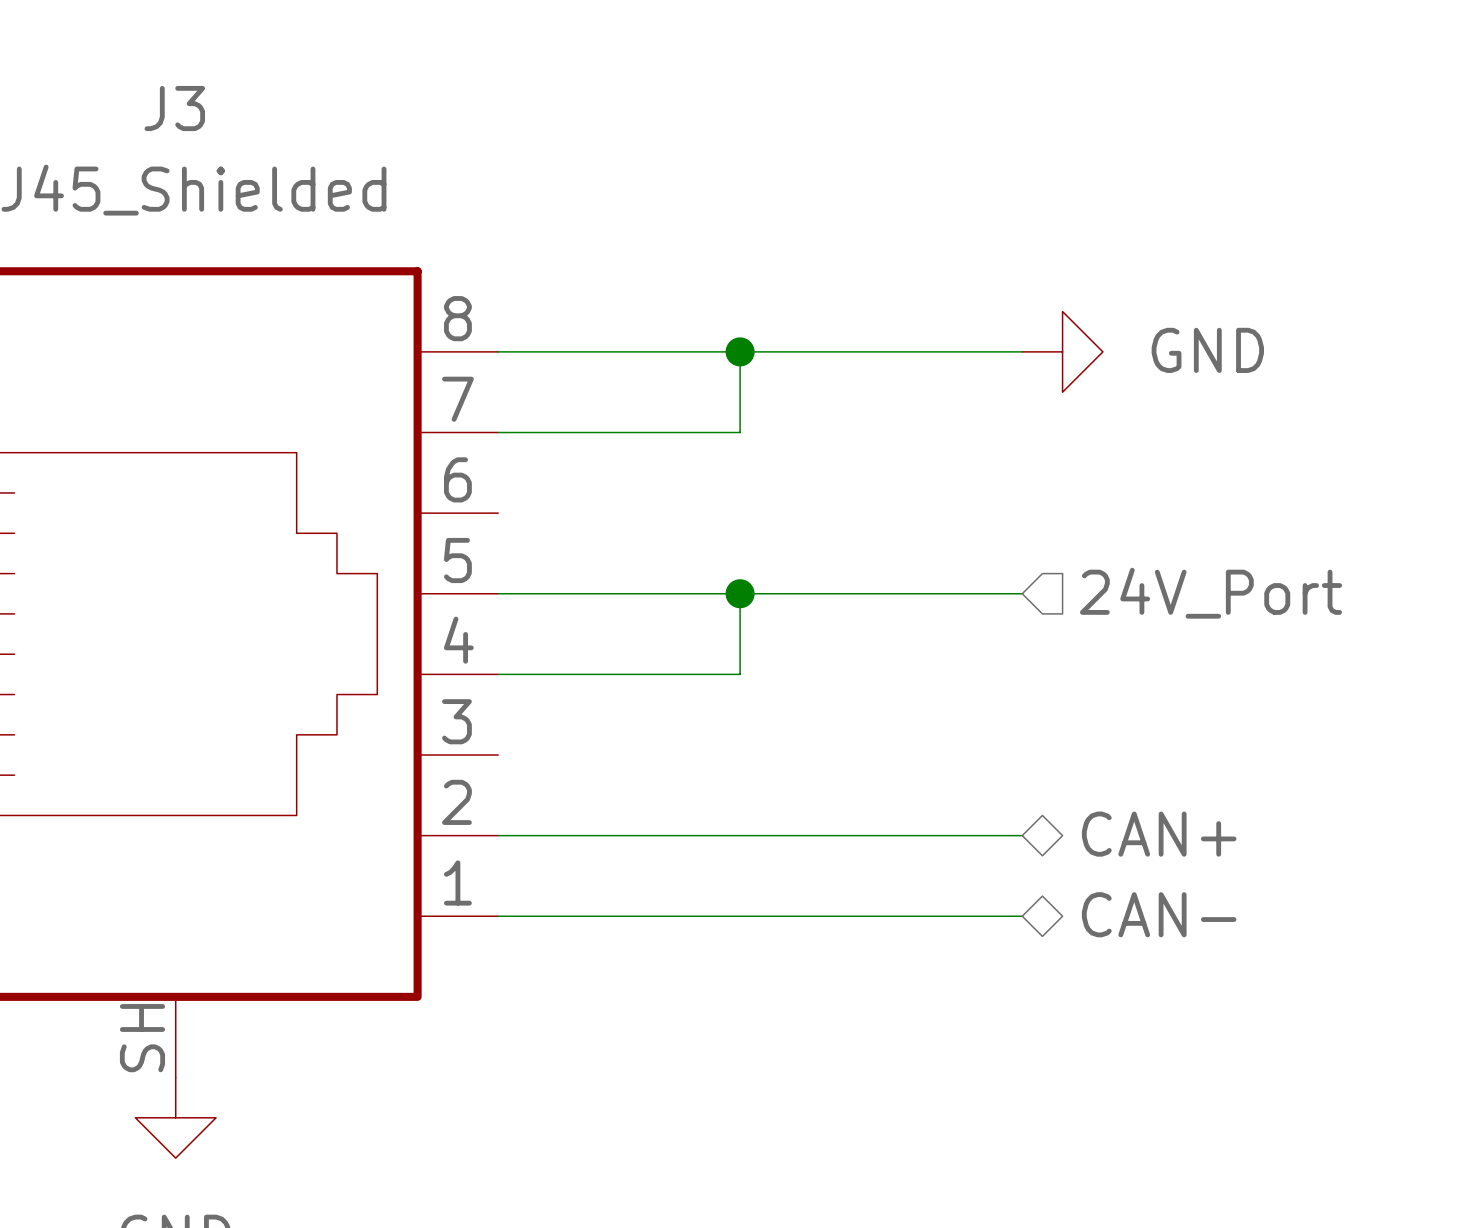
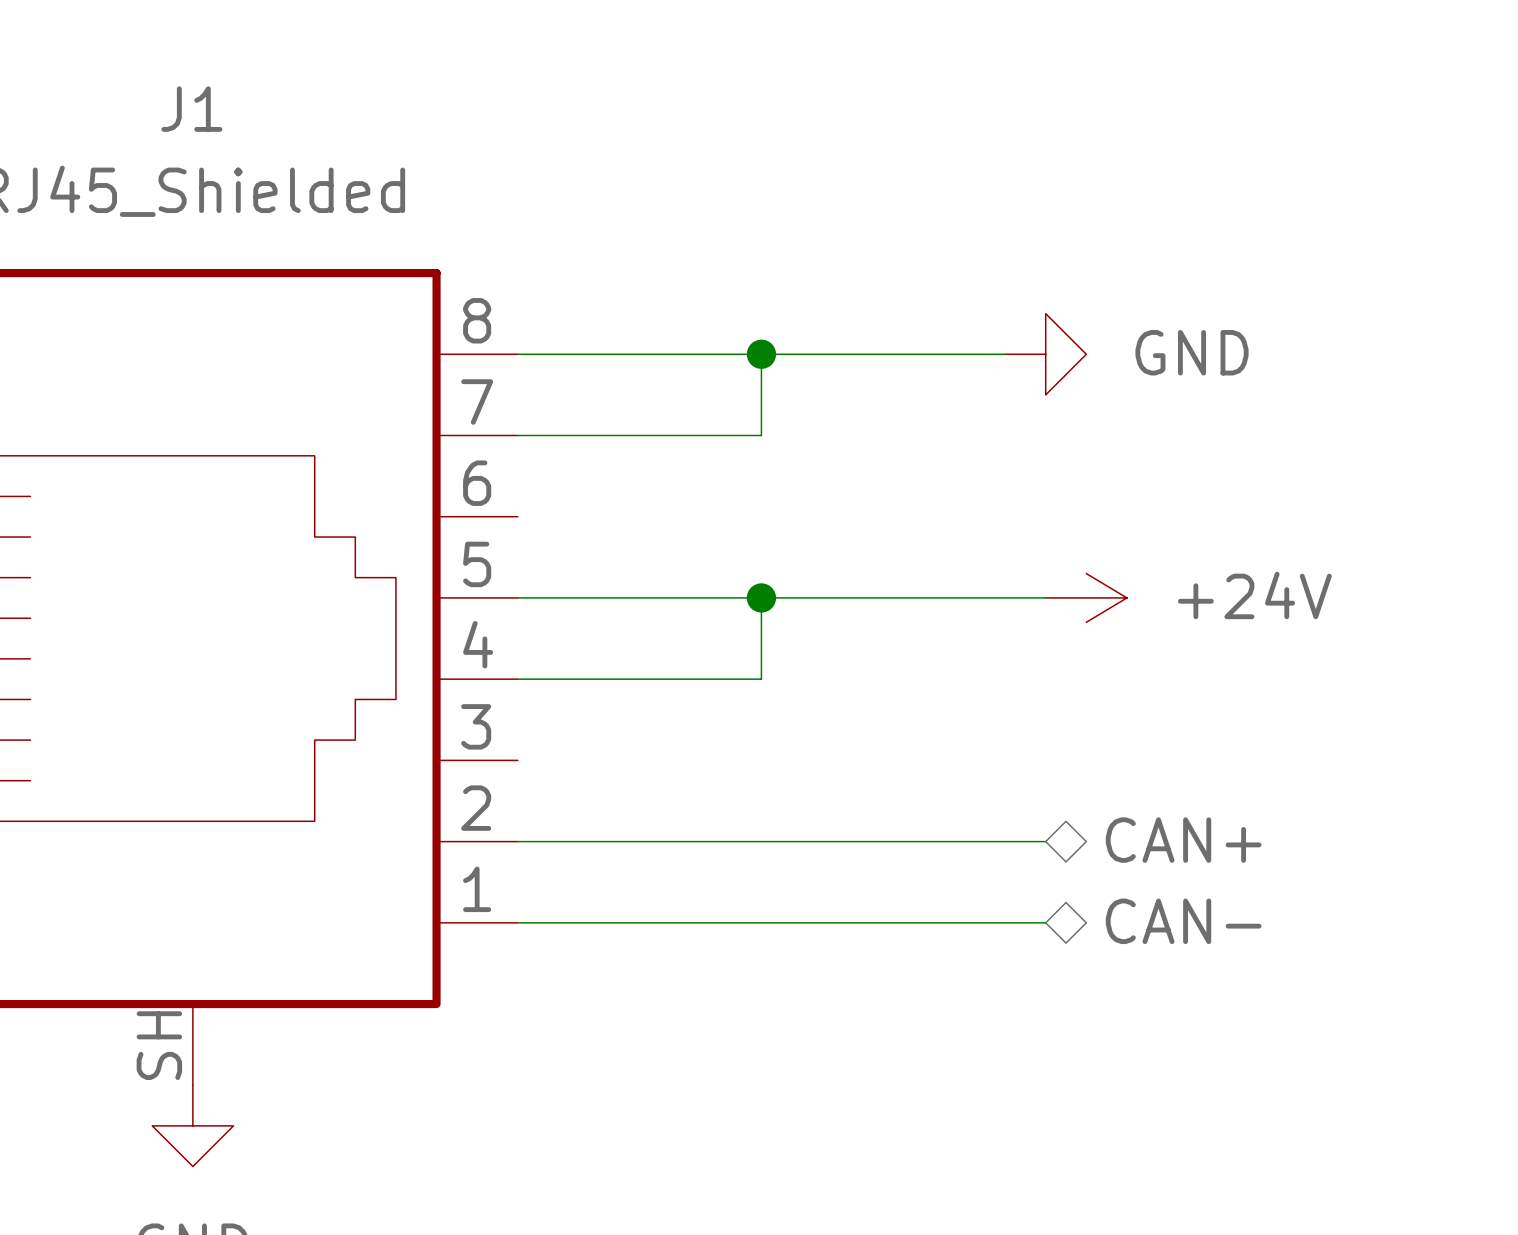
J3 name: J3 (174, 108) -> J1 (191, 109)
power symbol position: GND (1062, 351) -> GND (1045, 354)
power symbol: none -> +24V (1086, 597)
hierarchical label: 24V_Port (1211, 593) -> none

